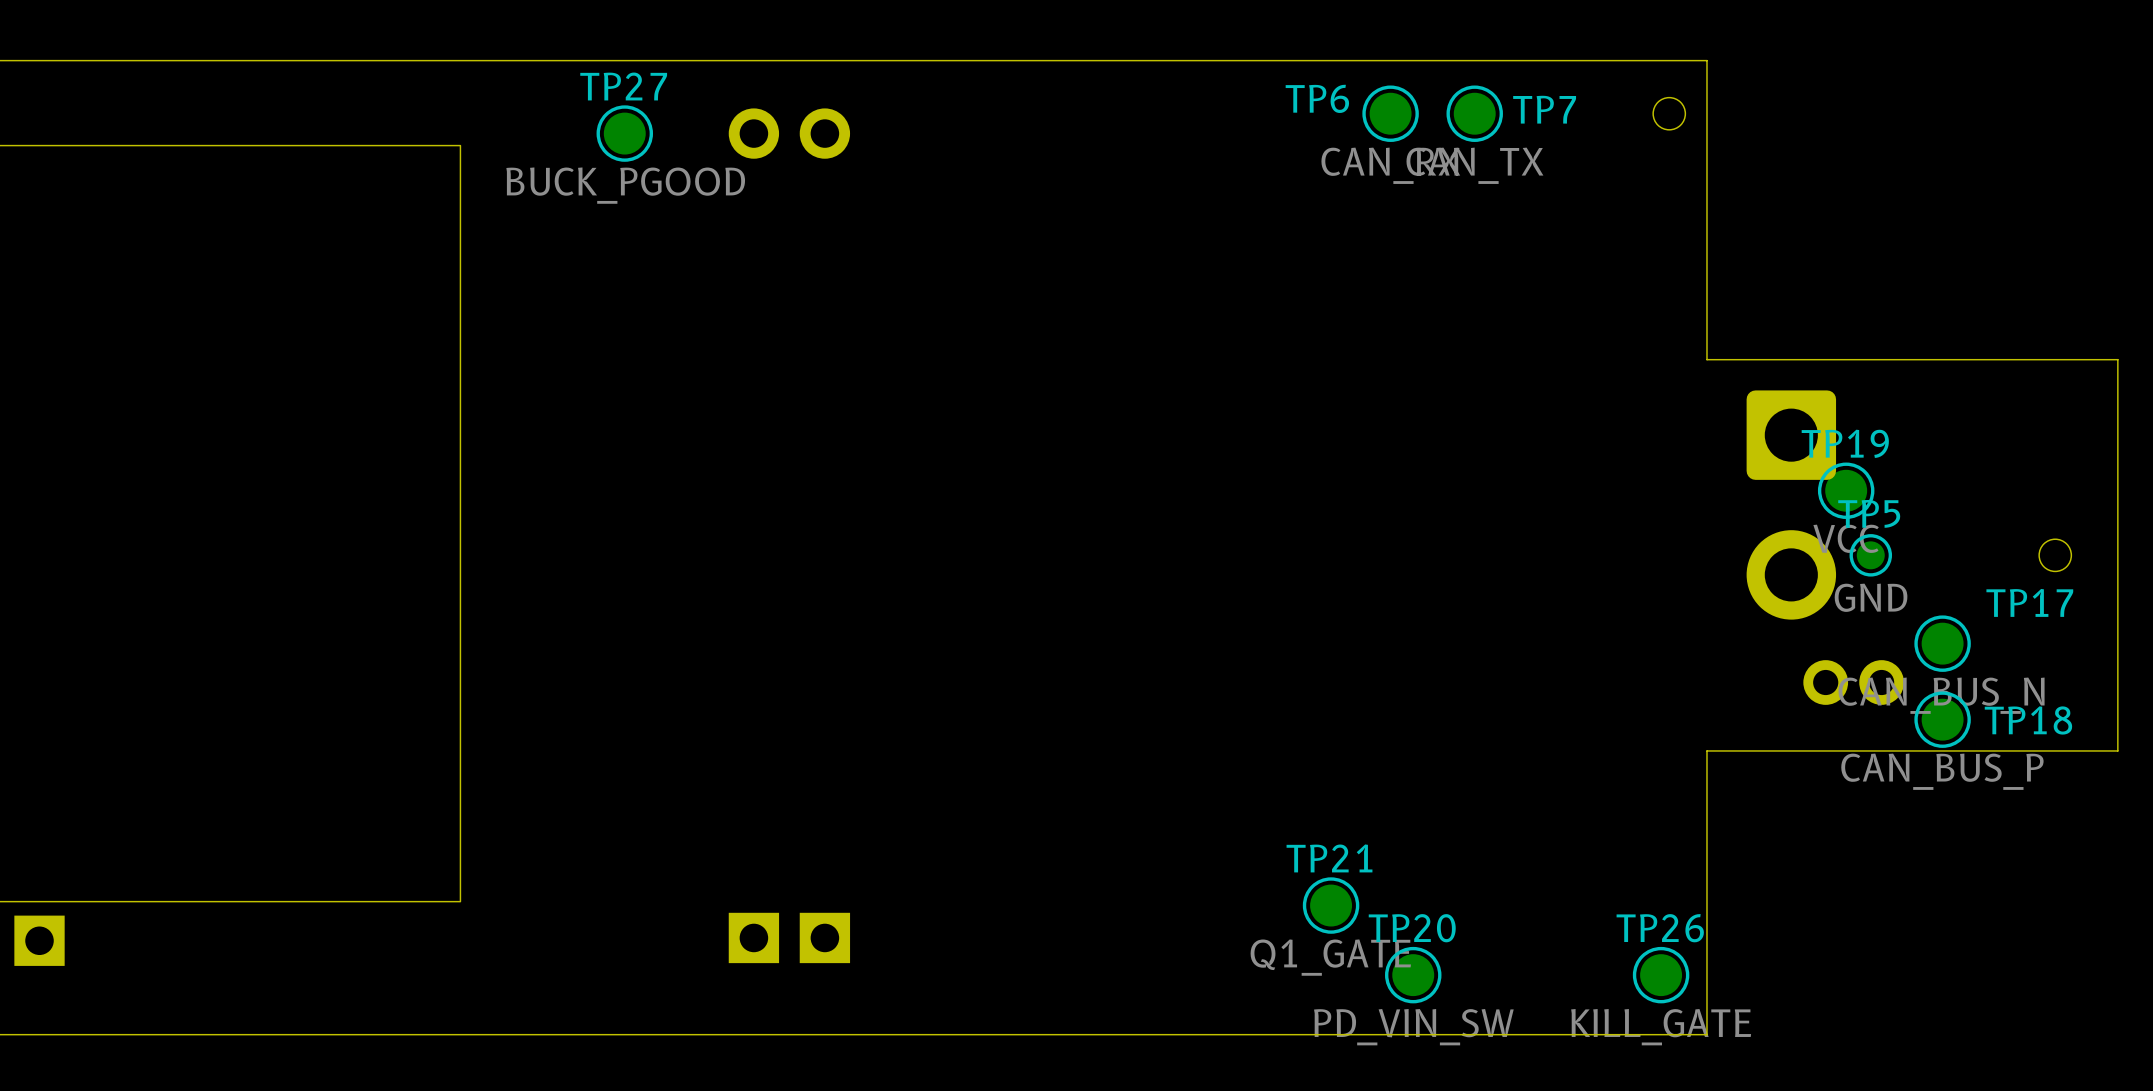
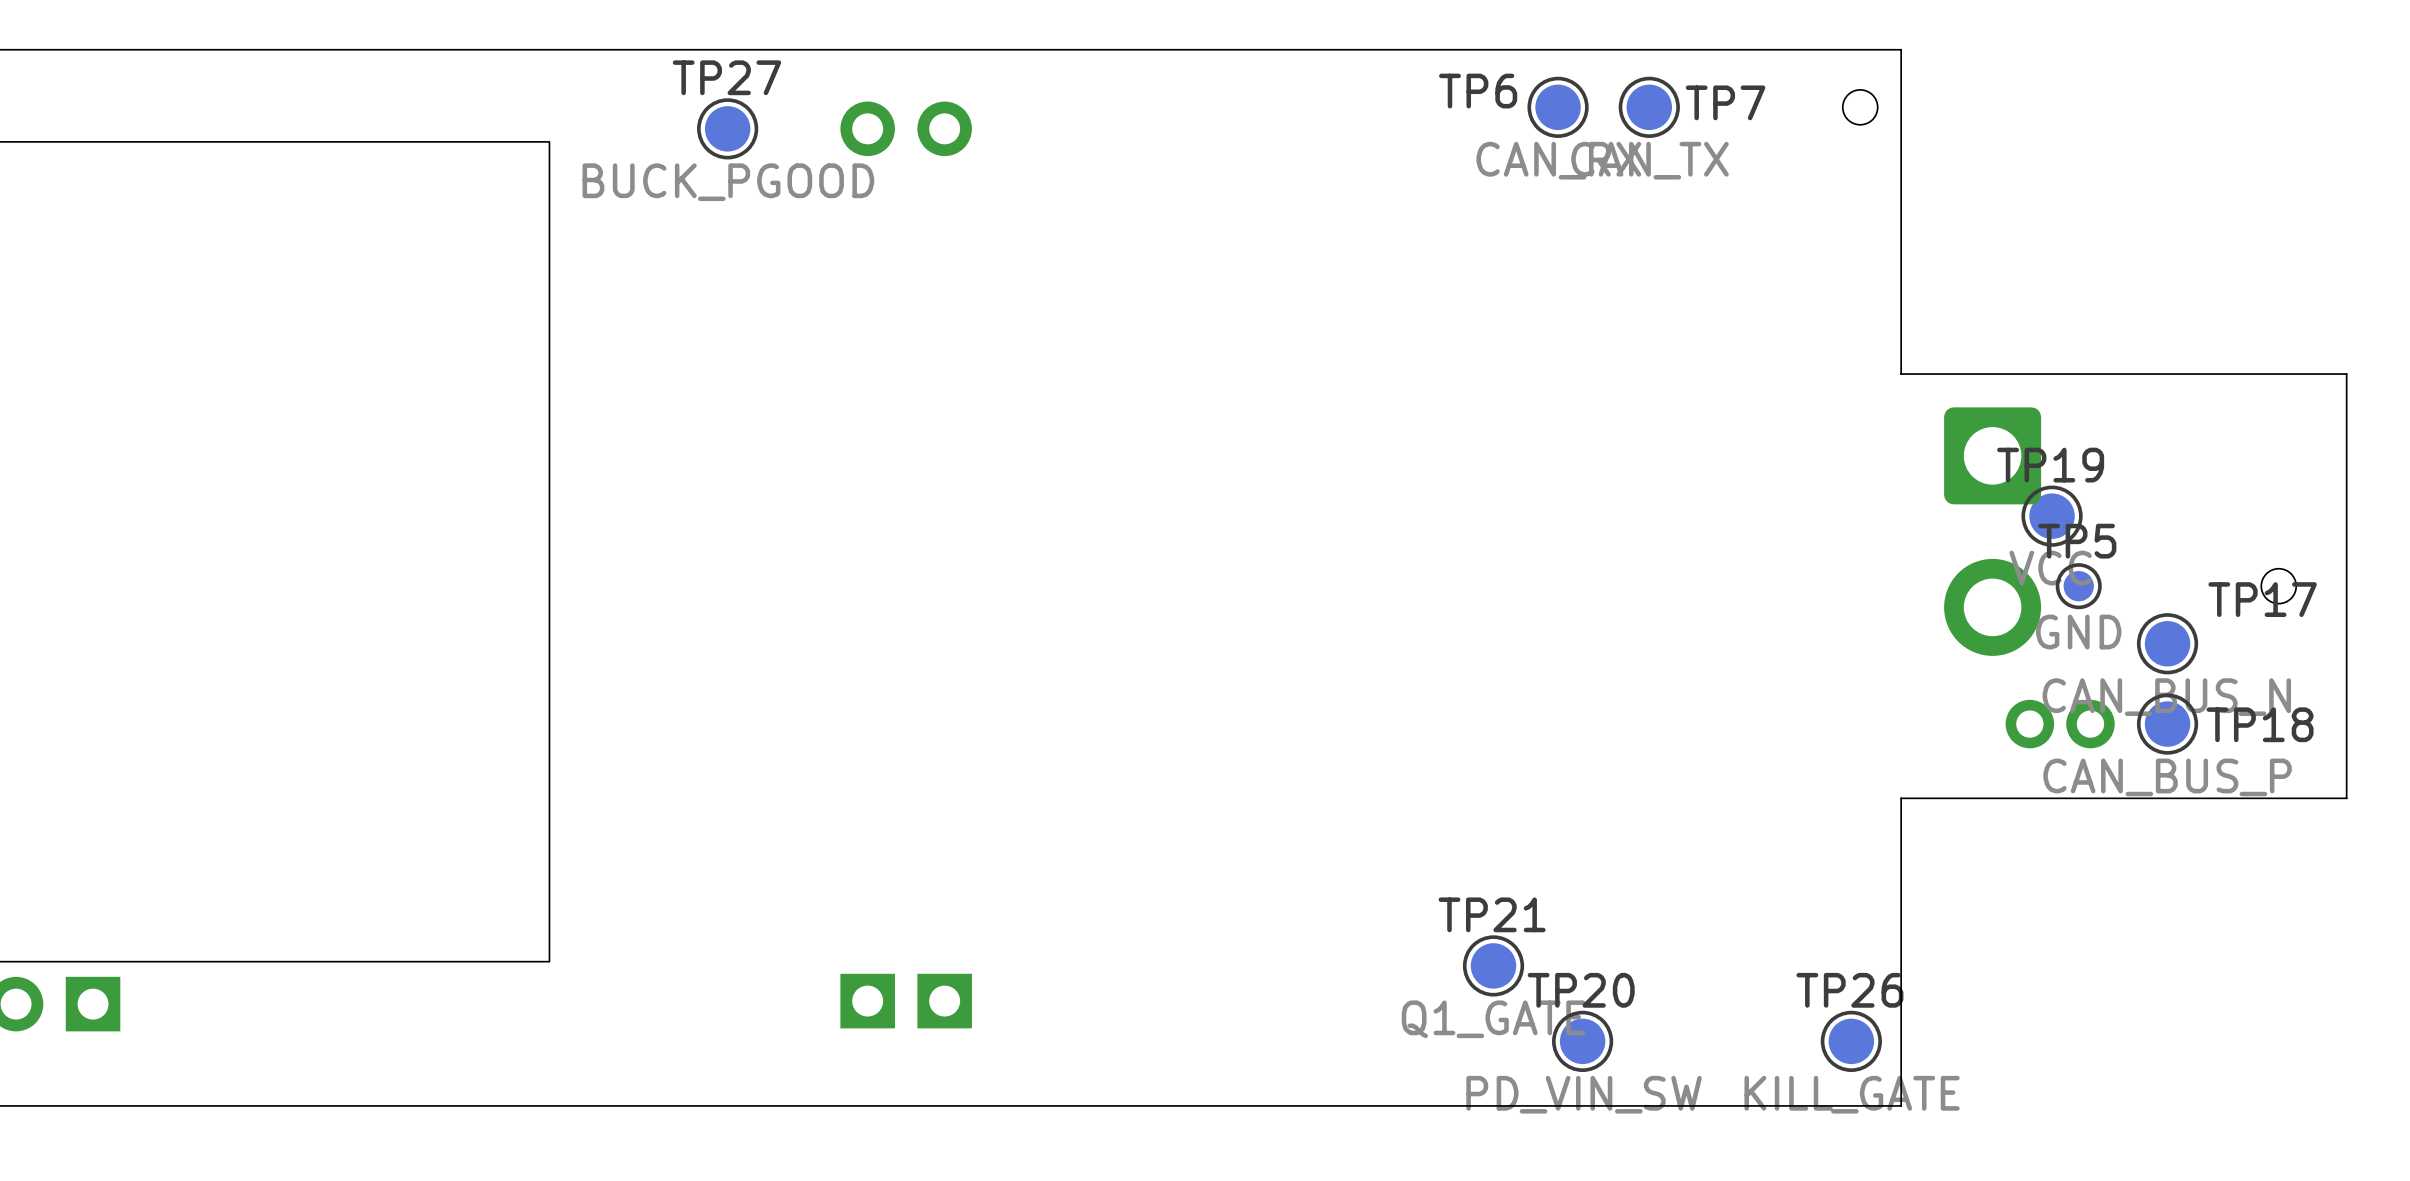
TP17 position: (1942, 643) -> (2167, 643)
TP18 position: (1942, 719) -> (2167, 724)

